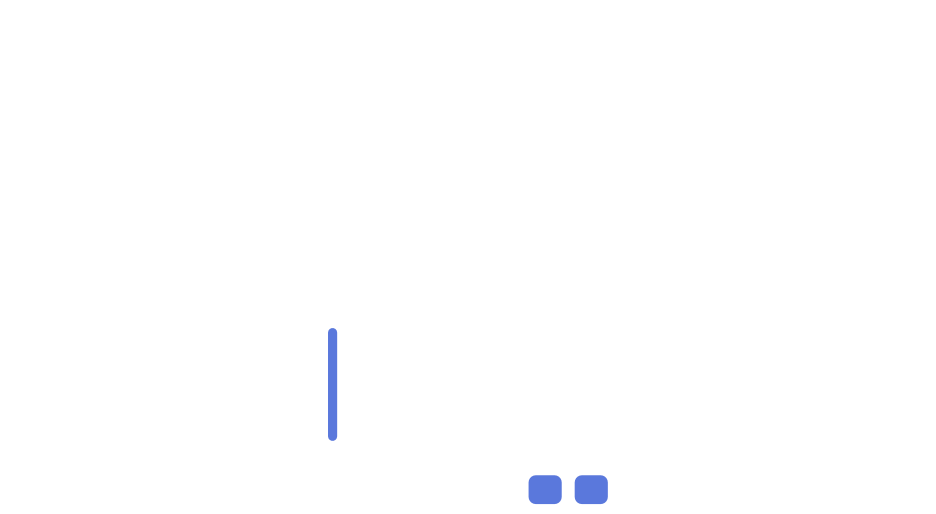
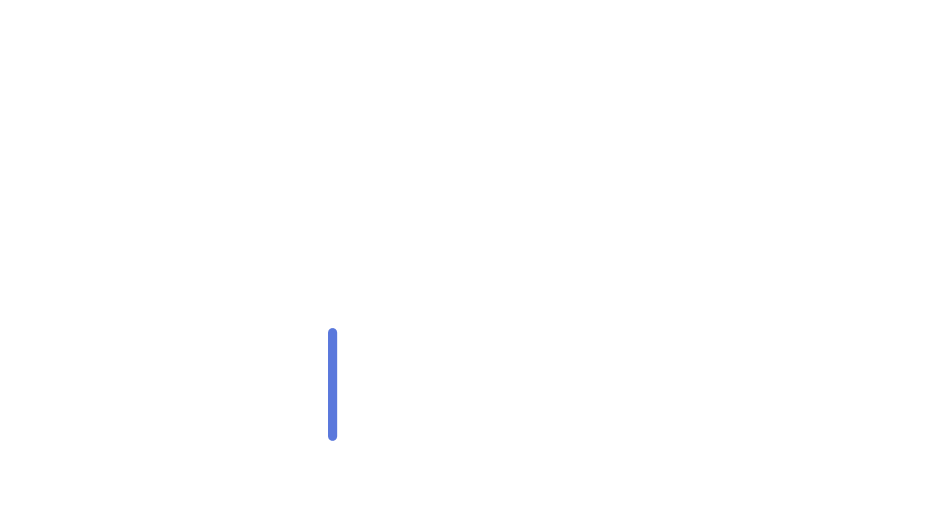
part: (568, 489) -> none

